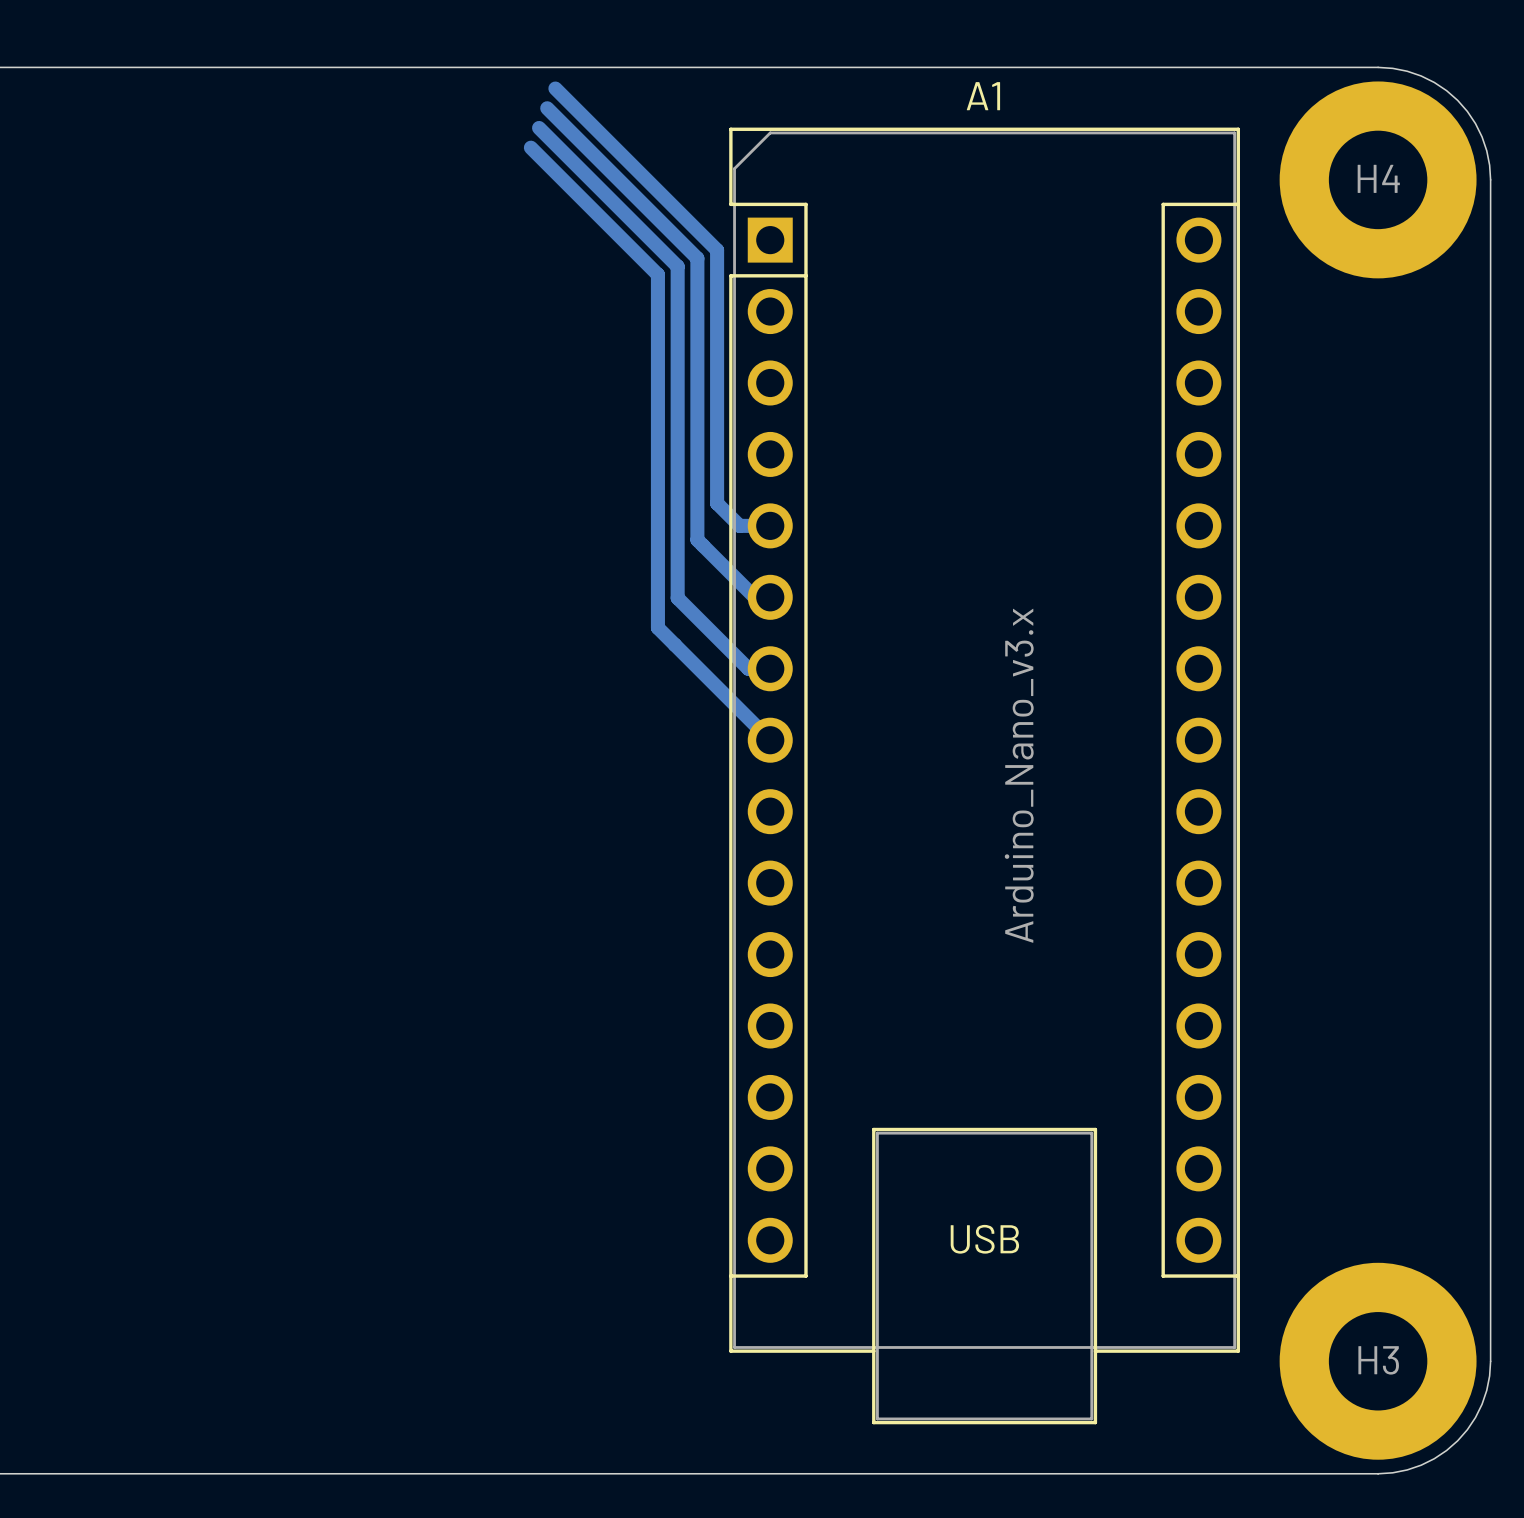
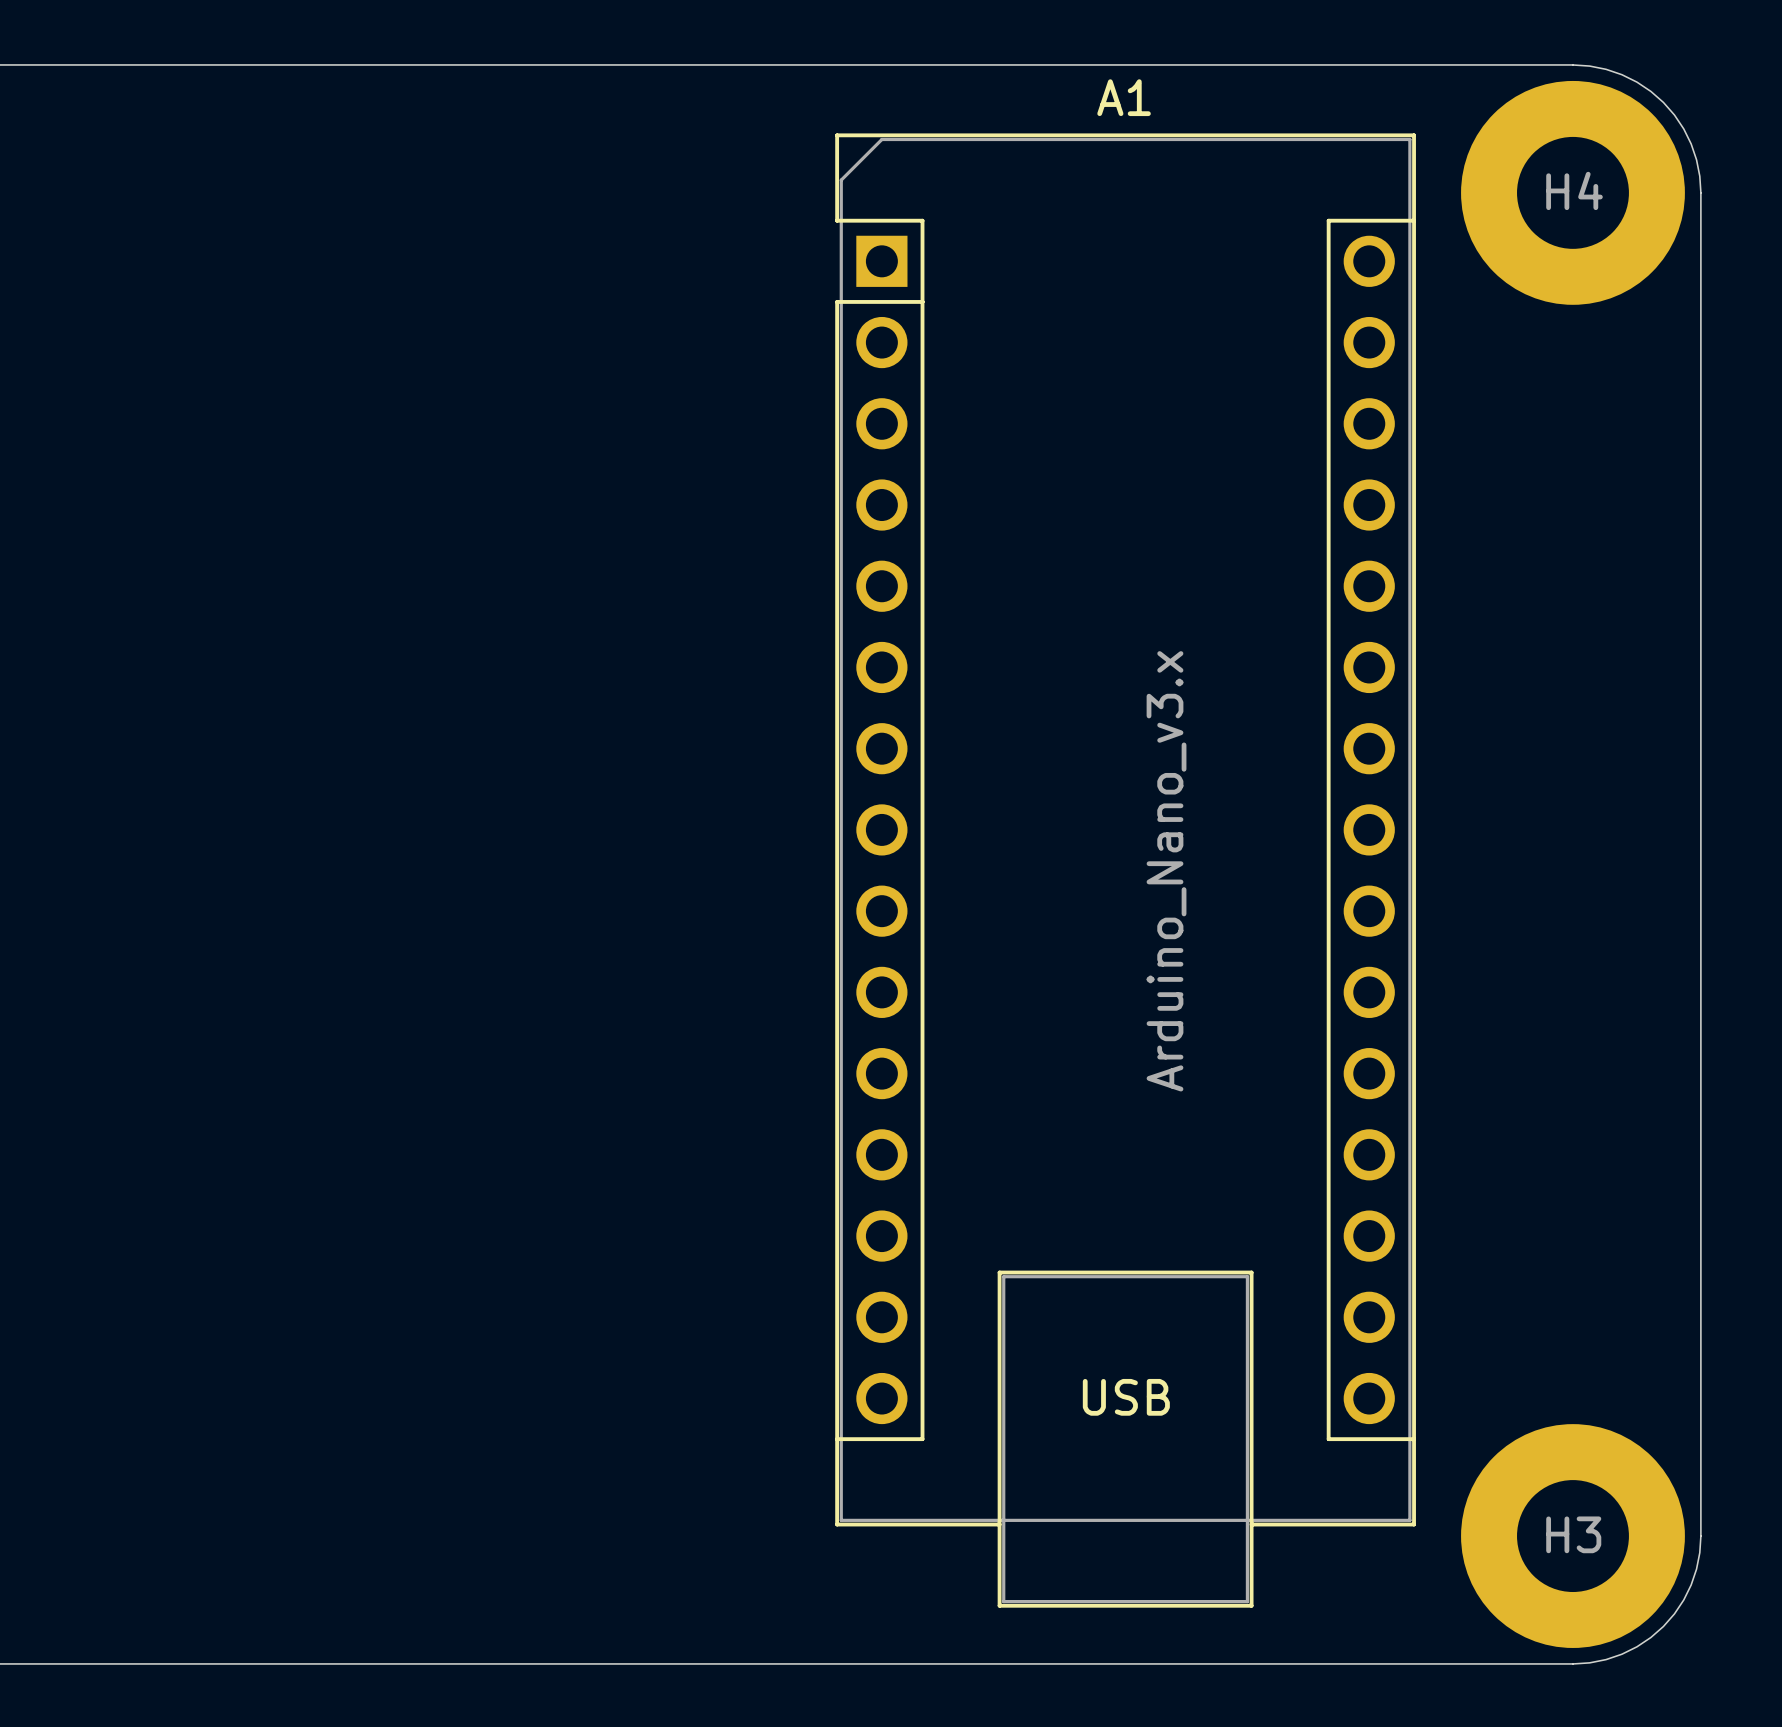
bottom track: (555, 88) (717, 250) (717, 503) (739, 525) (770, 525) -> none
bottom track: (547, 108) (697, 258) (697, 539) (754, 597) (770, 597) -> none
bottom track: (539, 127) (677, 266) (677, 598) (748, 668) (770, 668) -> none
bottom track: (530, 147) (657, 274) (657, 627) (770, 740) -> none

